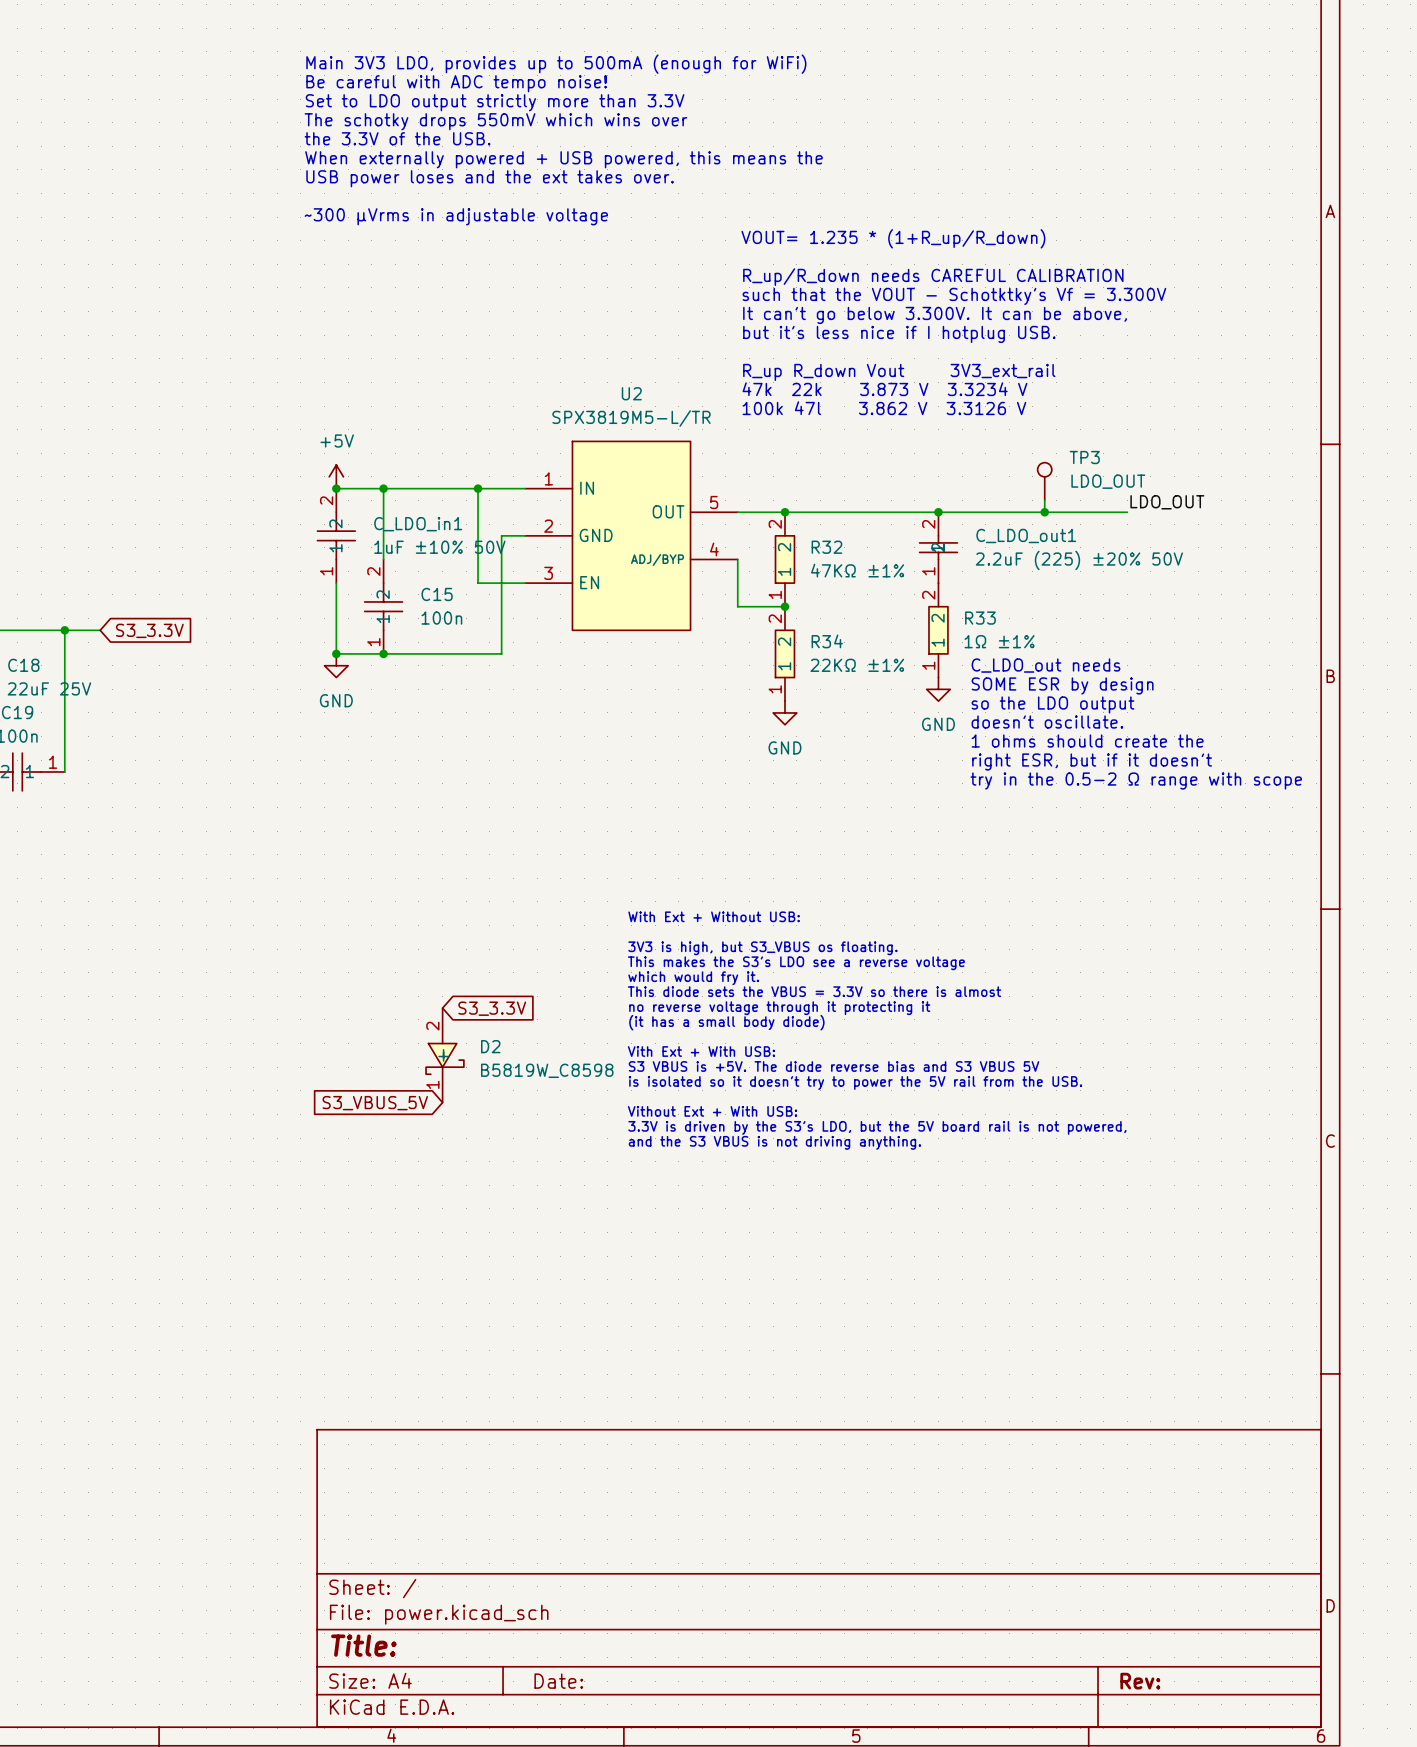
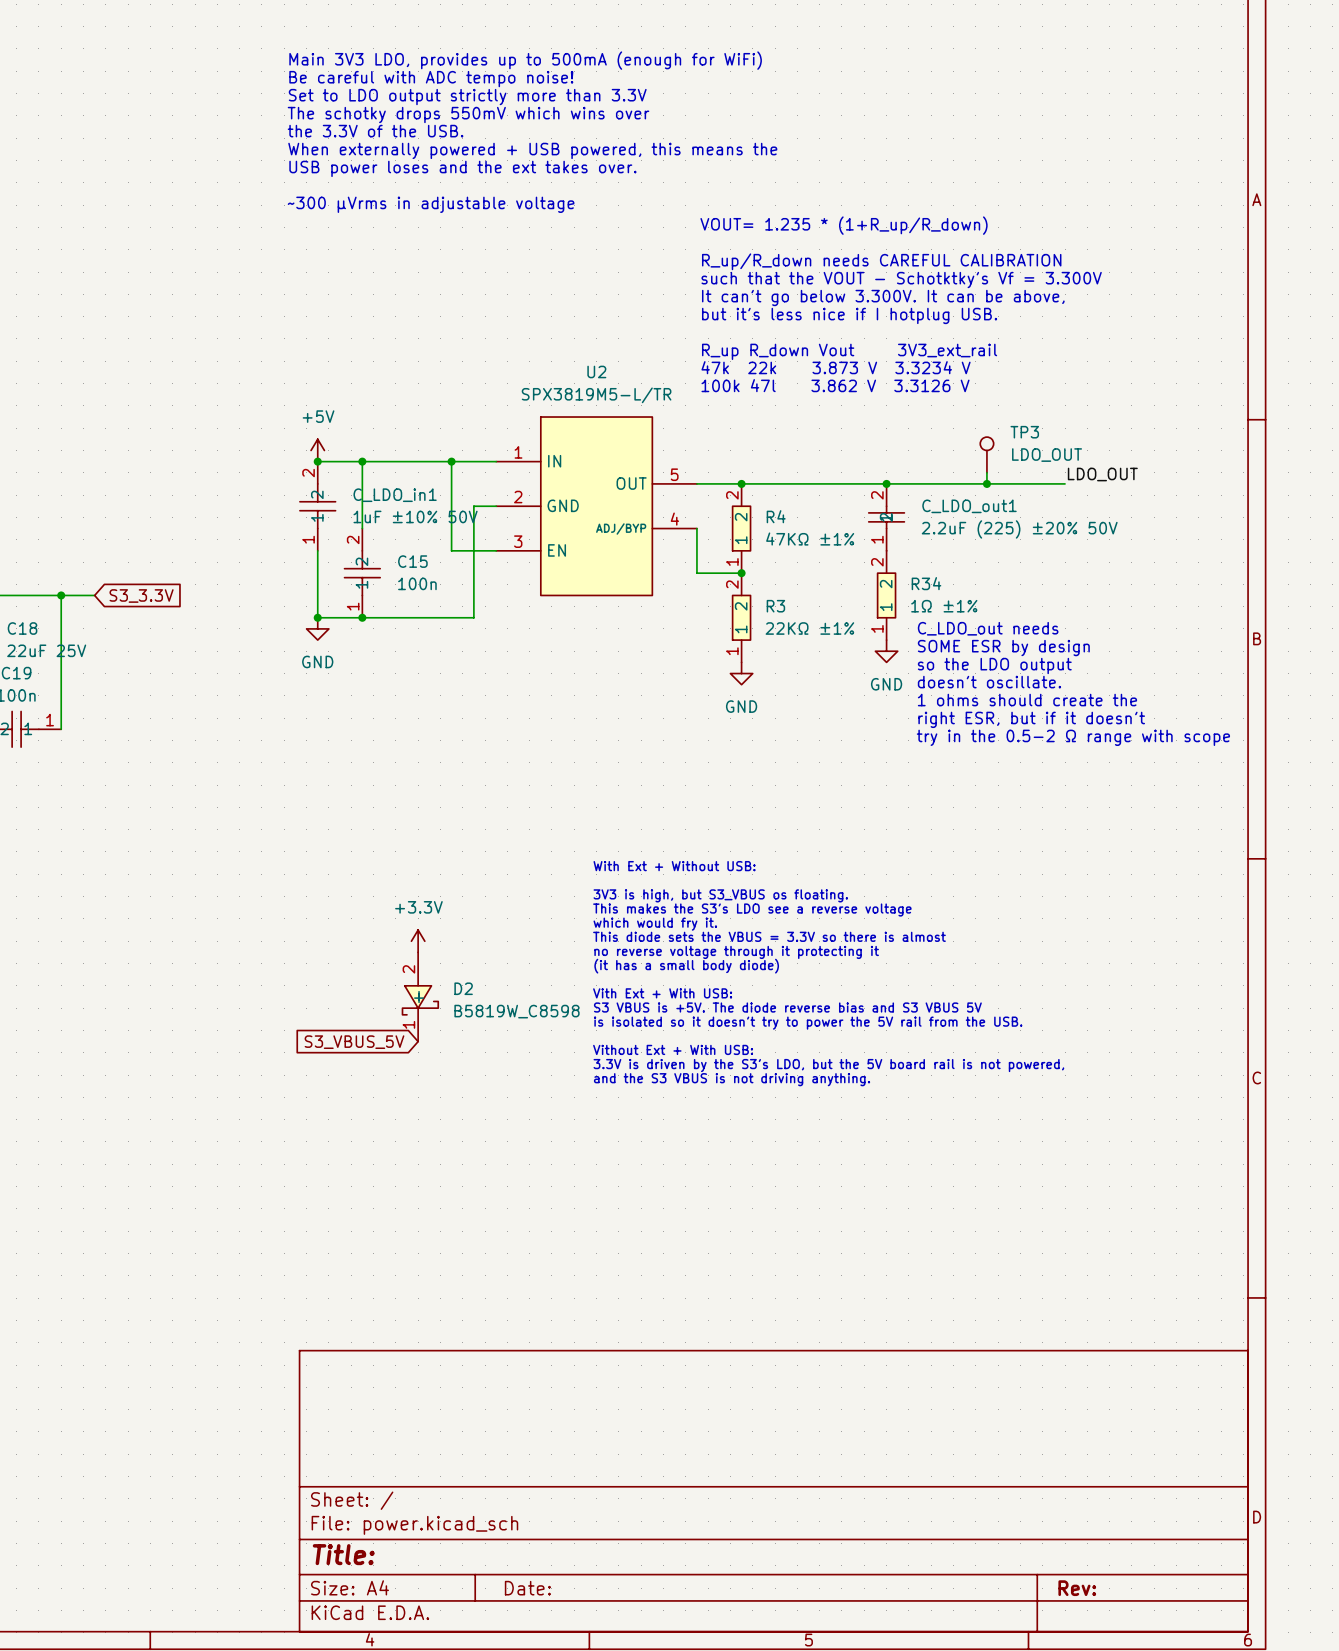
R32 name: R32 (826, 547) -> R4 (776, 516)
R33 name: R33 (980, 618) -> R34 (926, 583)
R34 name: R34 (827, 641) -> R3 (775, 606)
power symbol: none -> +3.3V (418, 941)
global label: S3_3.3V (492, 1008) -> none

